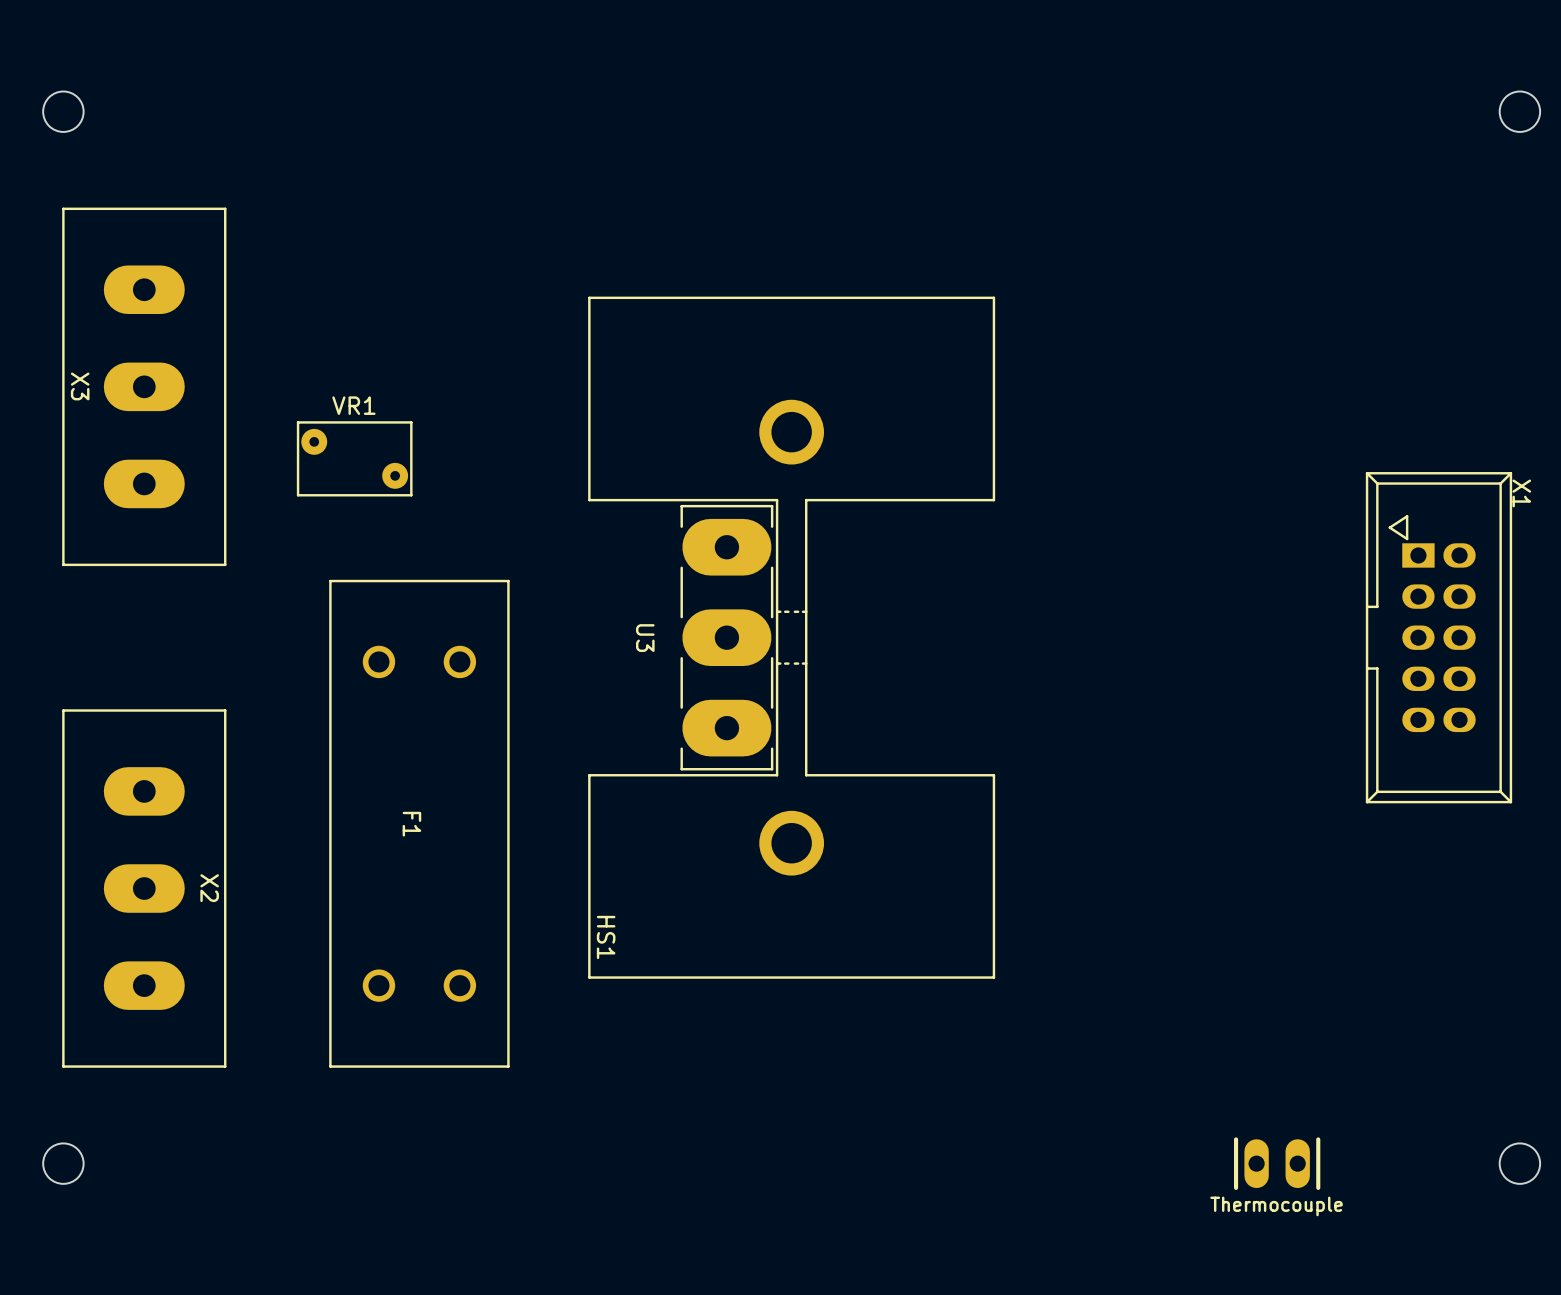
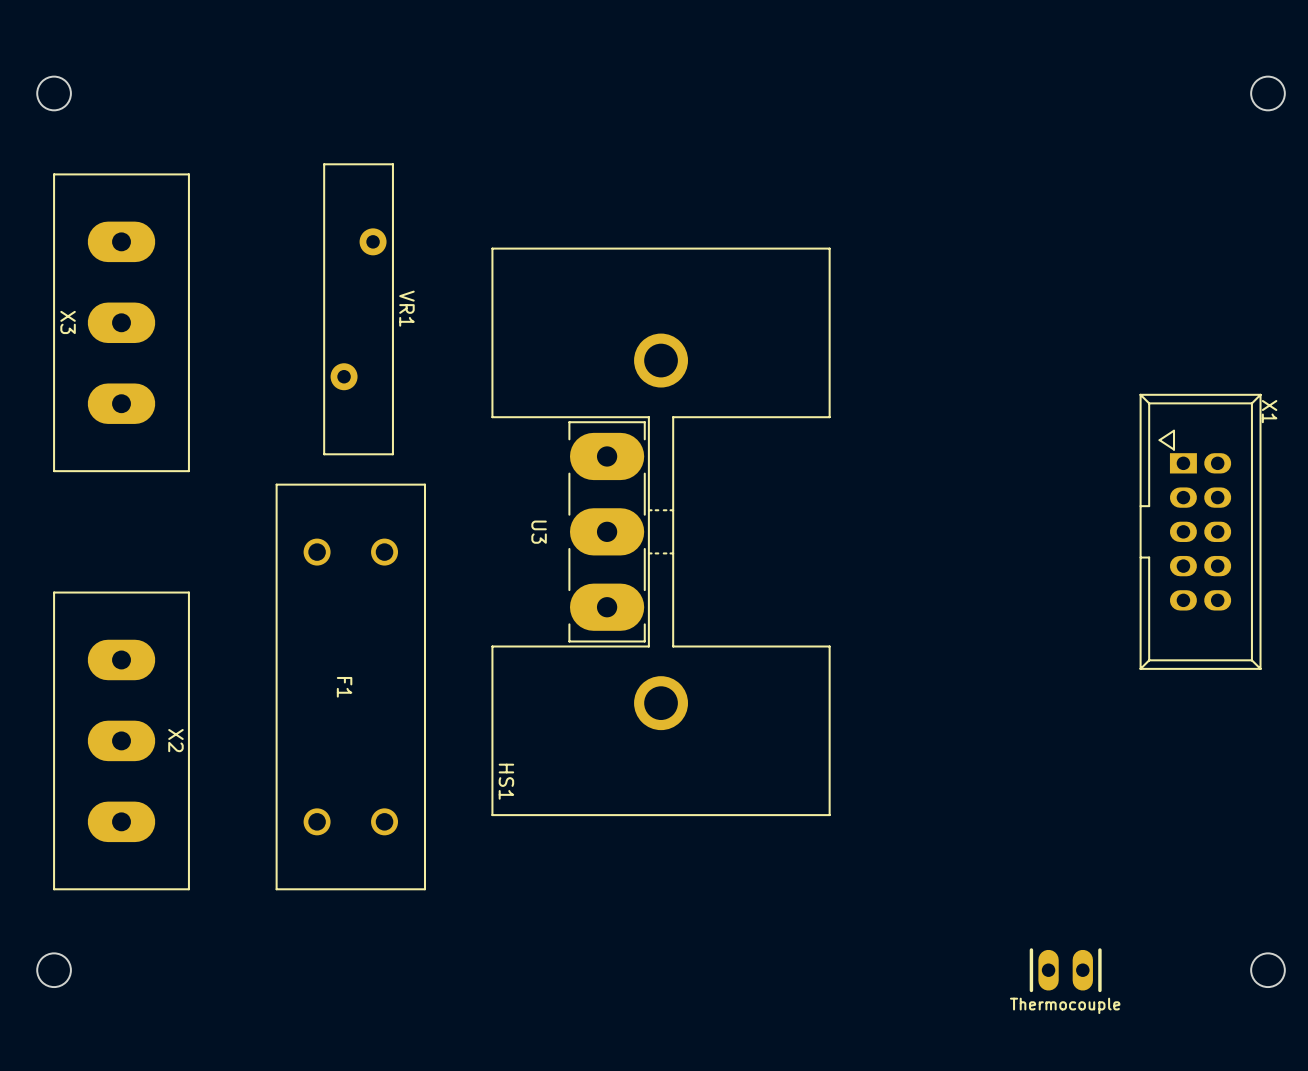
VR1 name position: VR1 (353, 405) -> VR1 (406, 308)
VR1 footprint: [296, 421, 413, 497] -> [323, 163, 394, 456]

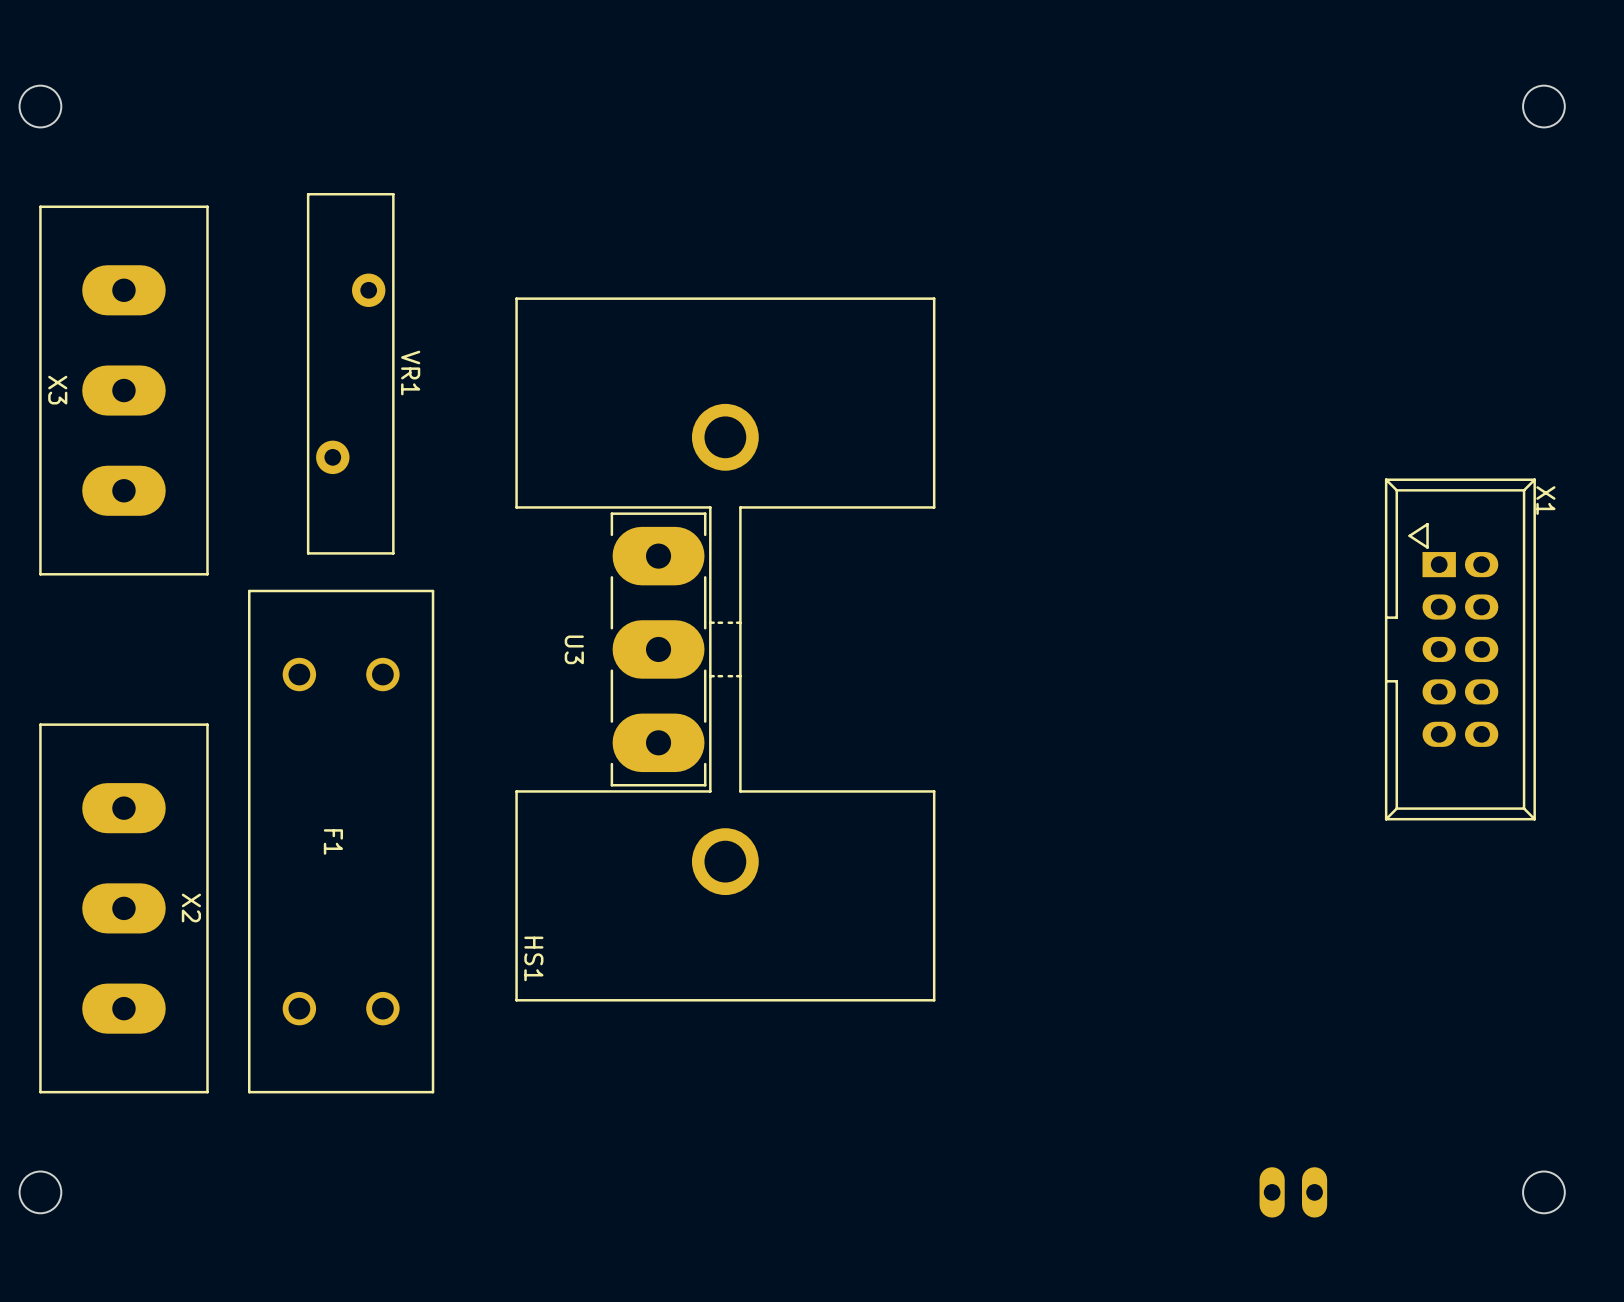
VR1 position: (358, 309) -> (350, 373)
U3 position: (607, 531) -> (658, 649)
HS1 position: (661, 531) -> (725, 649)
F1 position: (350, 686) -> (341, 841)
part side: bottom (1065, 970) -> top (1293, 1192)

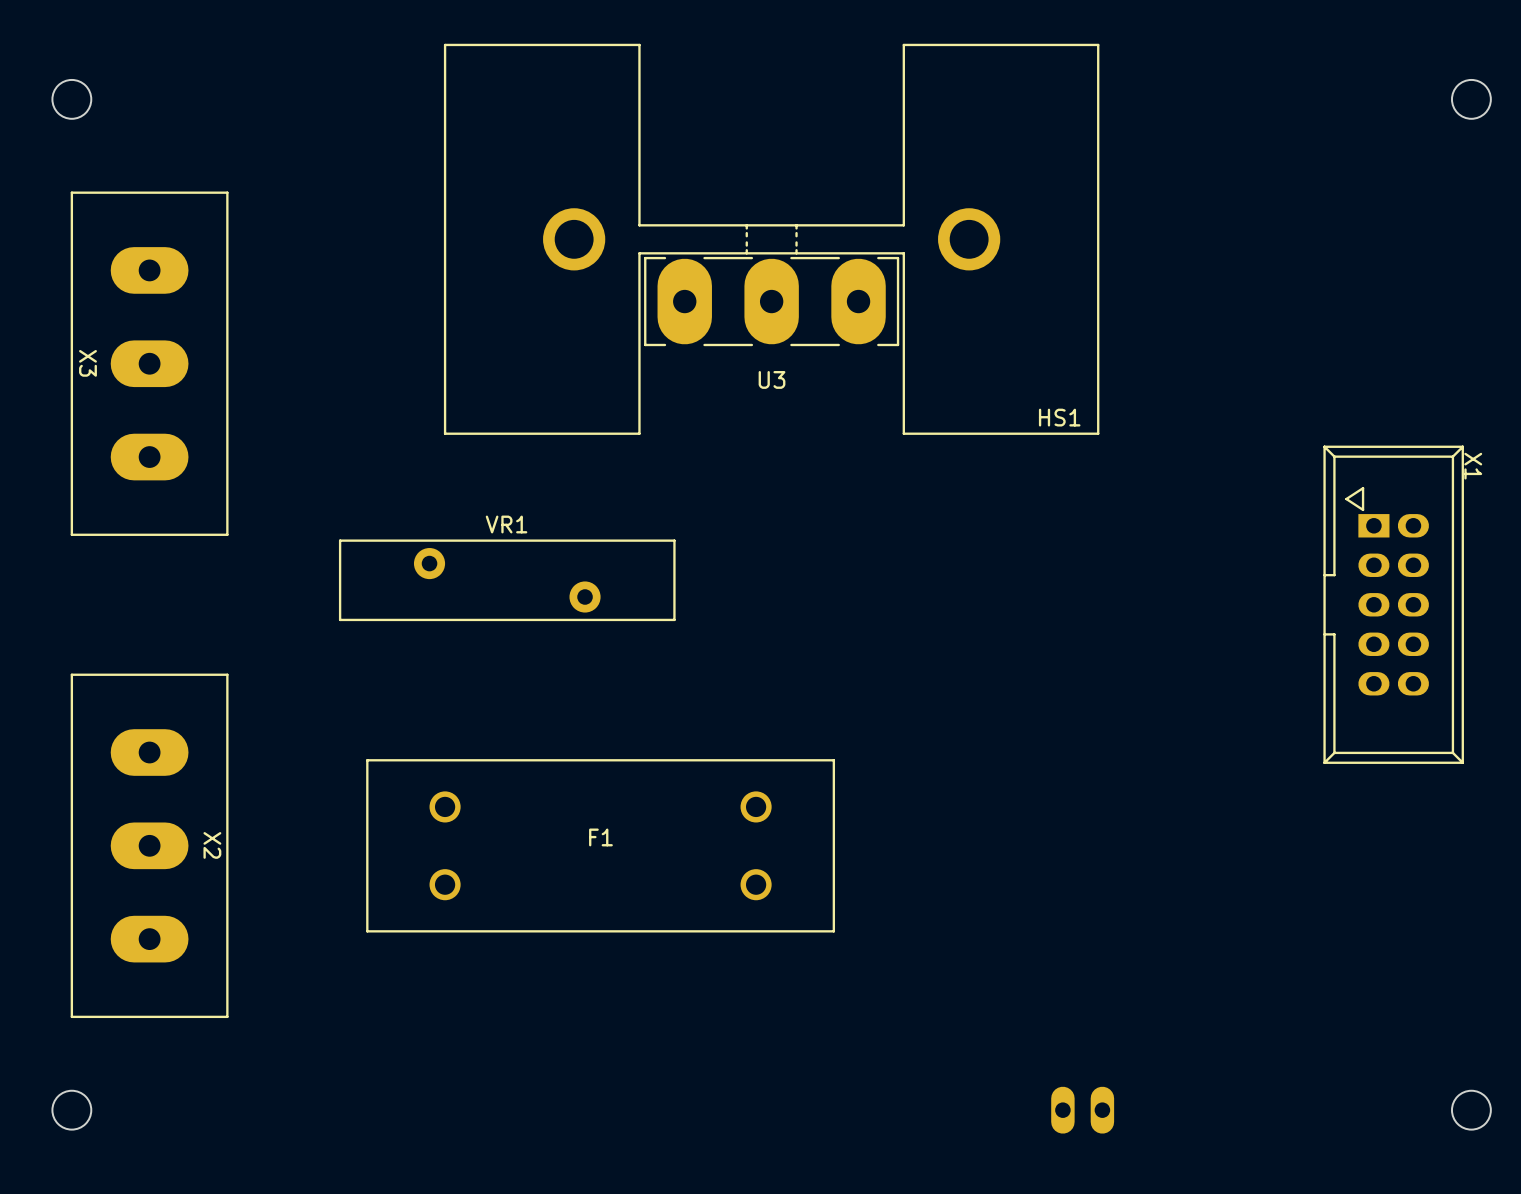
VR1 rotation: 0° (350, 373) -> 90° clockwise (507, 580)
VR1 position: (350, 373) -> (507, 580)
VR1 name position: VR1 (410, 373) -> VR1 (506, 524)
U3 name position: U3 (574, 649) -> U3 (772, 379)
U3 rotation: 0° (658, 649) -> 90° clockwise (771, 301)
U3 position: (658, 649) -> (771, 301)
HS1 rotation: 0° (725, 649) -> 90° clockwise (771, 239)
F1 rotation: 0° (341, 841) -> 90° clockwise (600, 845)
HS1 name position: HS1 (533, 958) -> HS1 (1059, 417)
part position: (1293, 1192) -> (1082, 1110)

